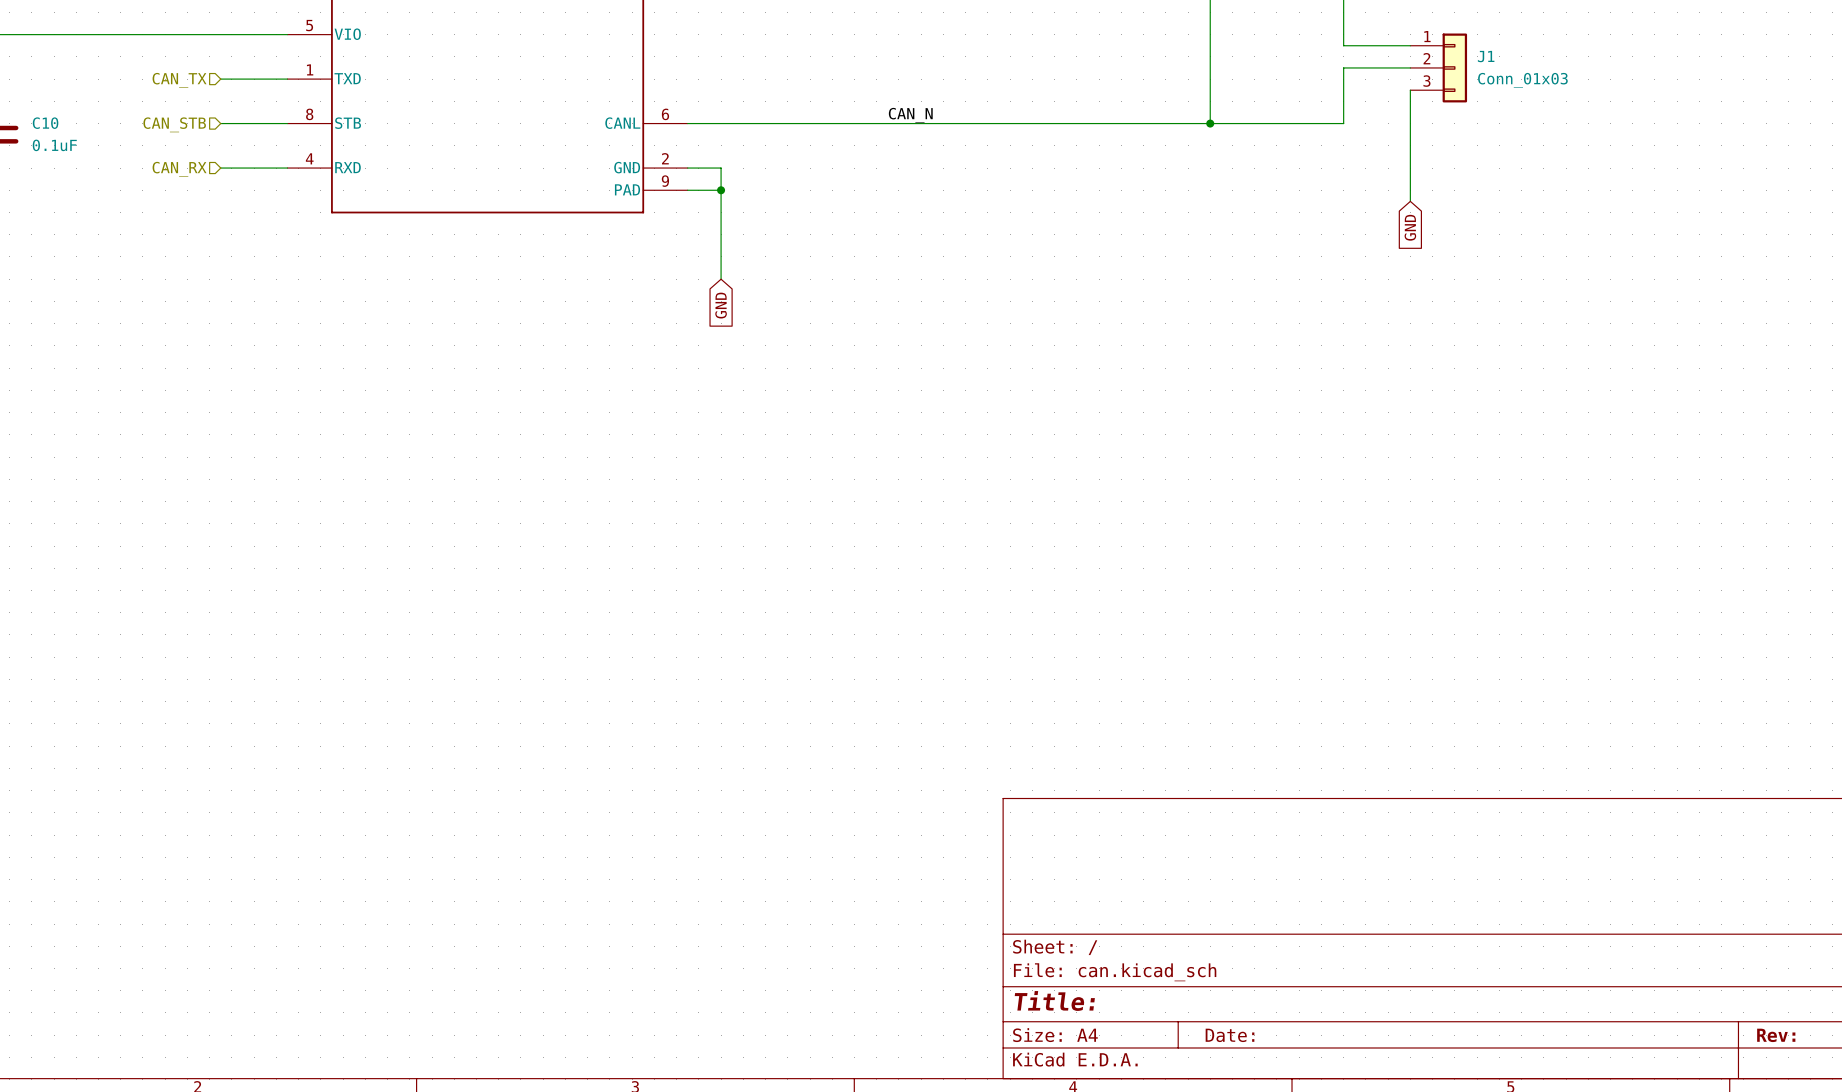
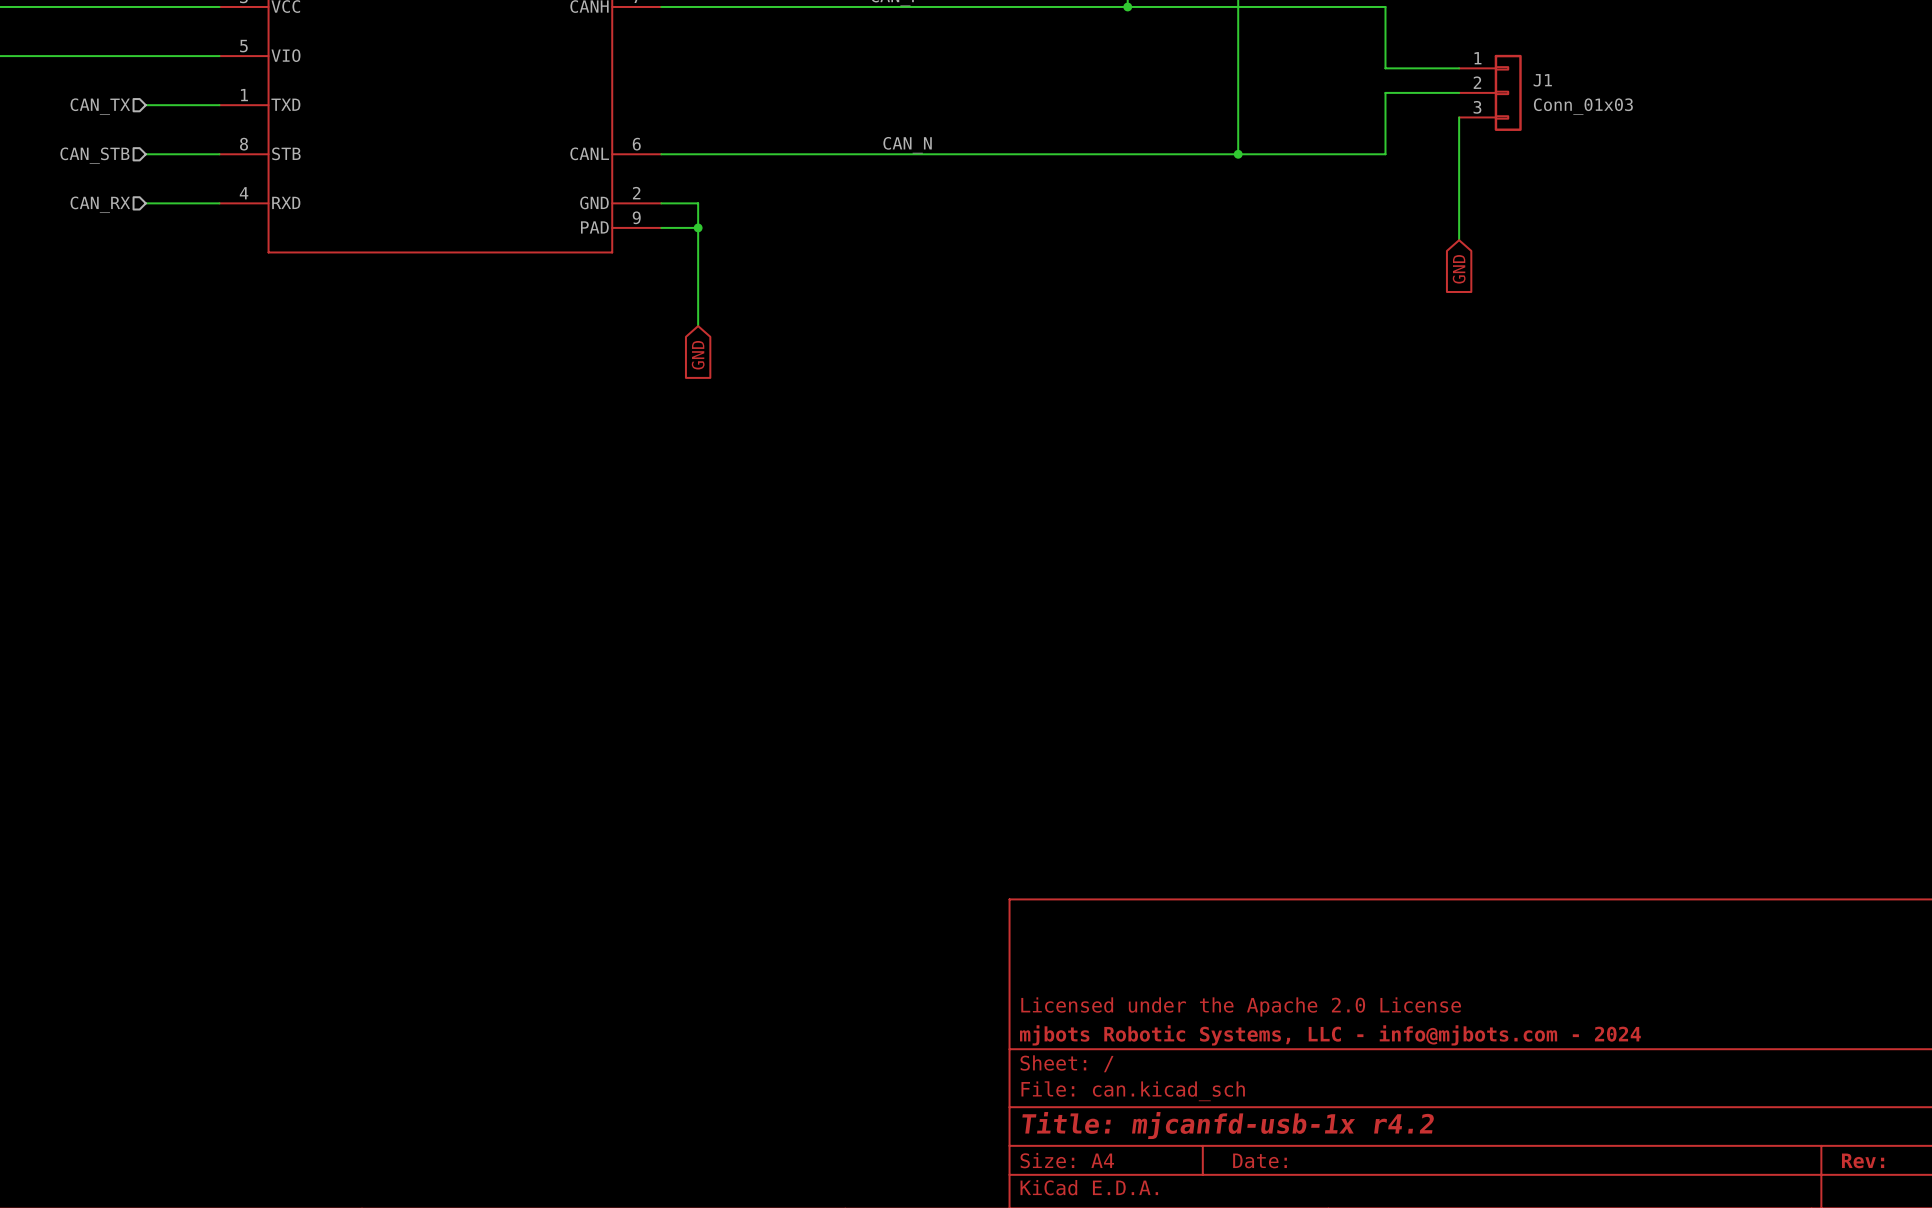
title block: none -> Licensed under the Apache 2.0 License (1241, 1006)
title block: none -> mjbots Robotic Systems, LLC - info@mjbots.com - 2024 (1330, 1035)
title block: Title: (1054, 1000) -> Title: mjcanfd-usb-1x r4.2 (1228, 1125)

